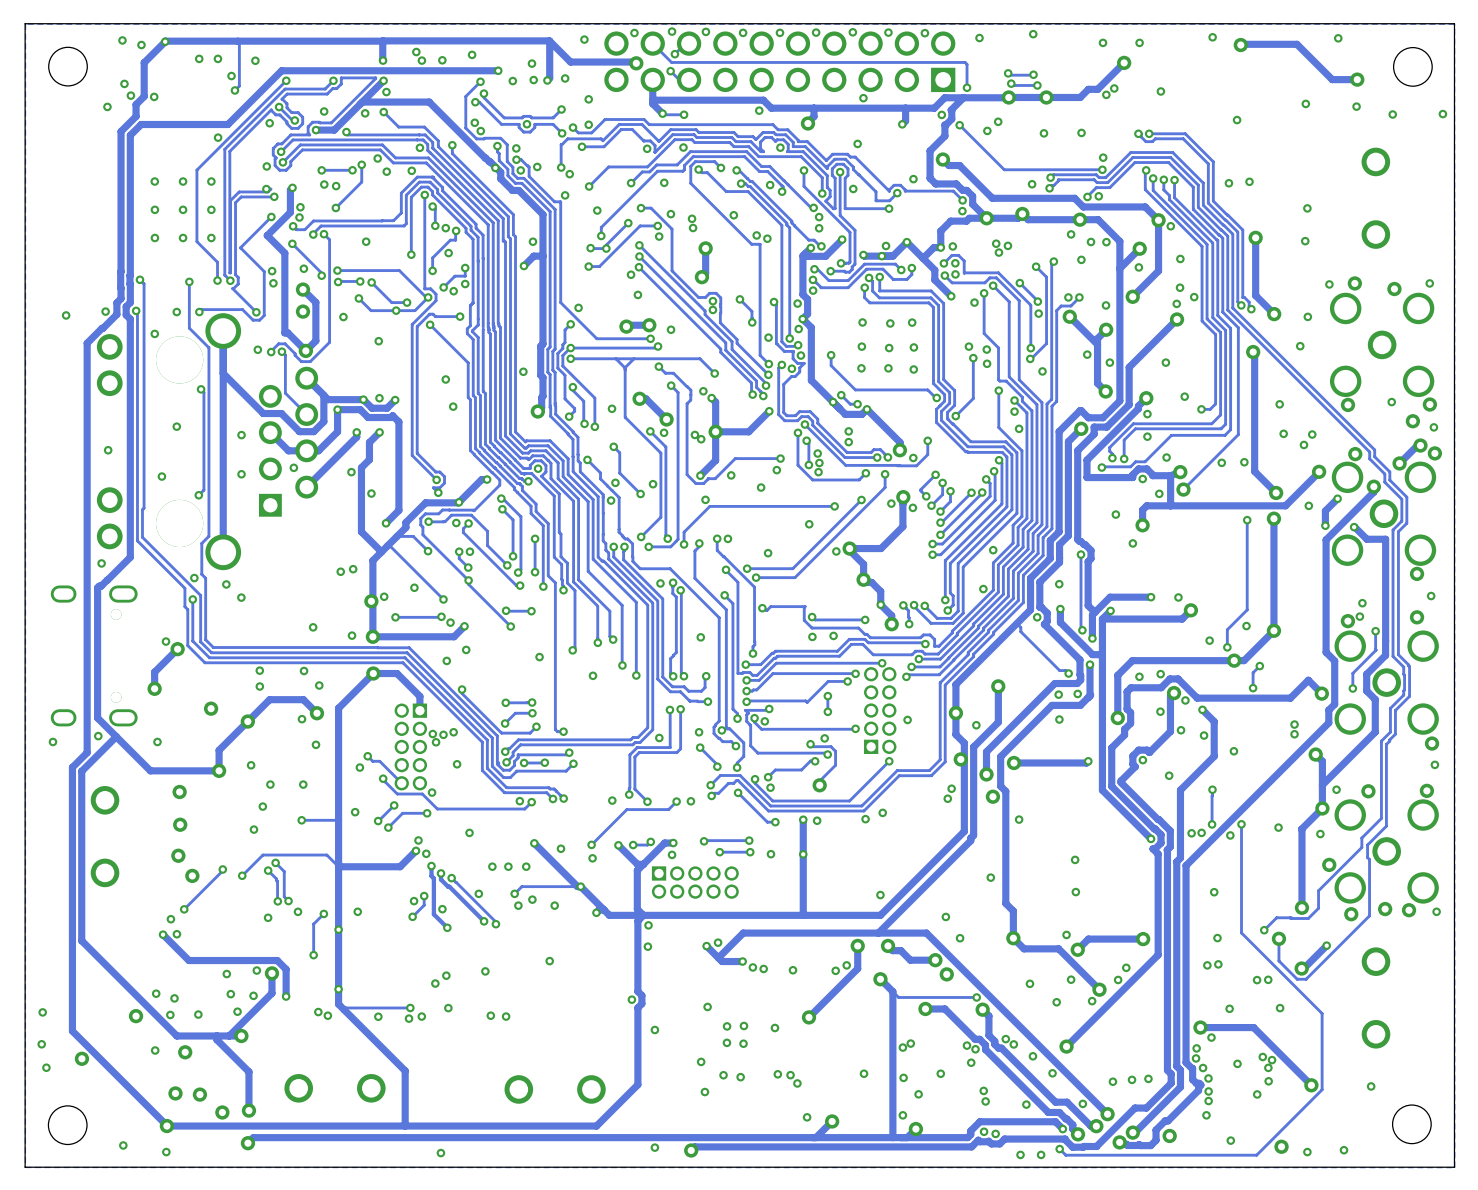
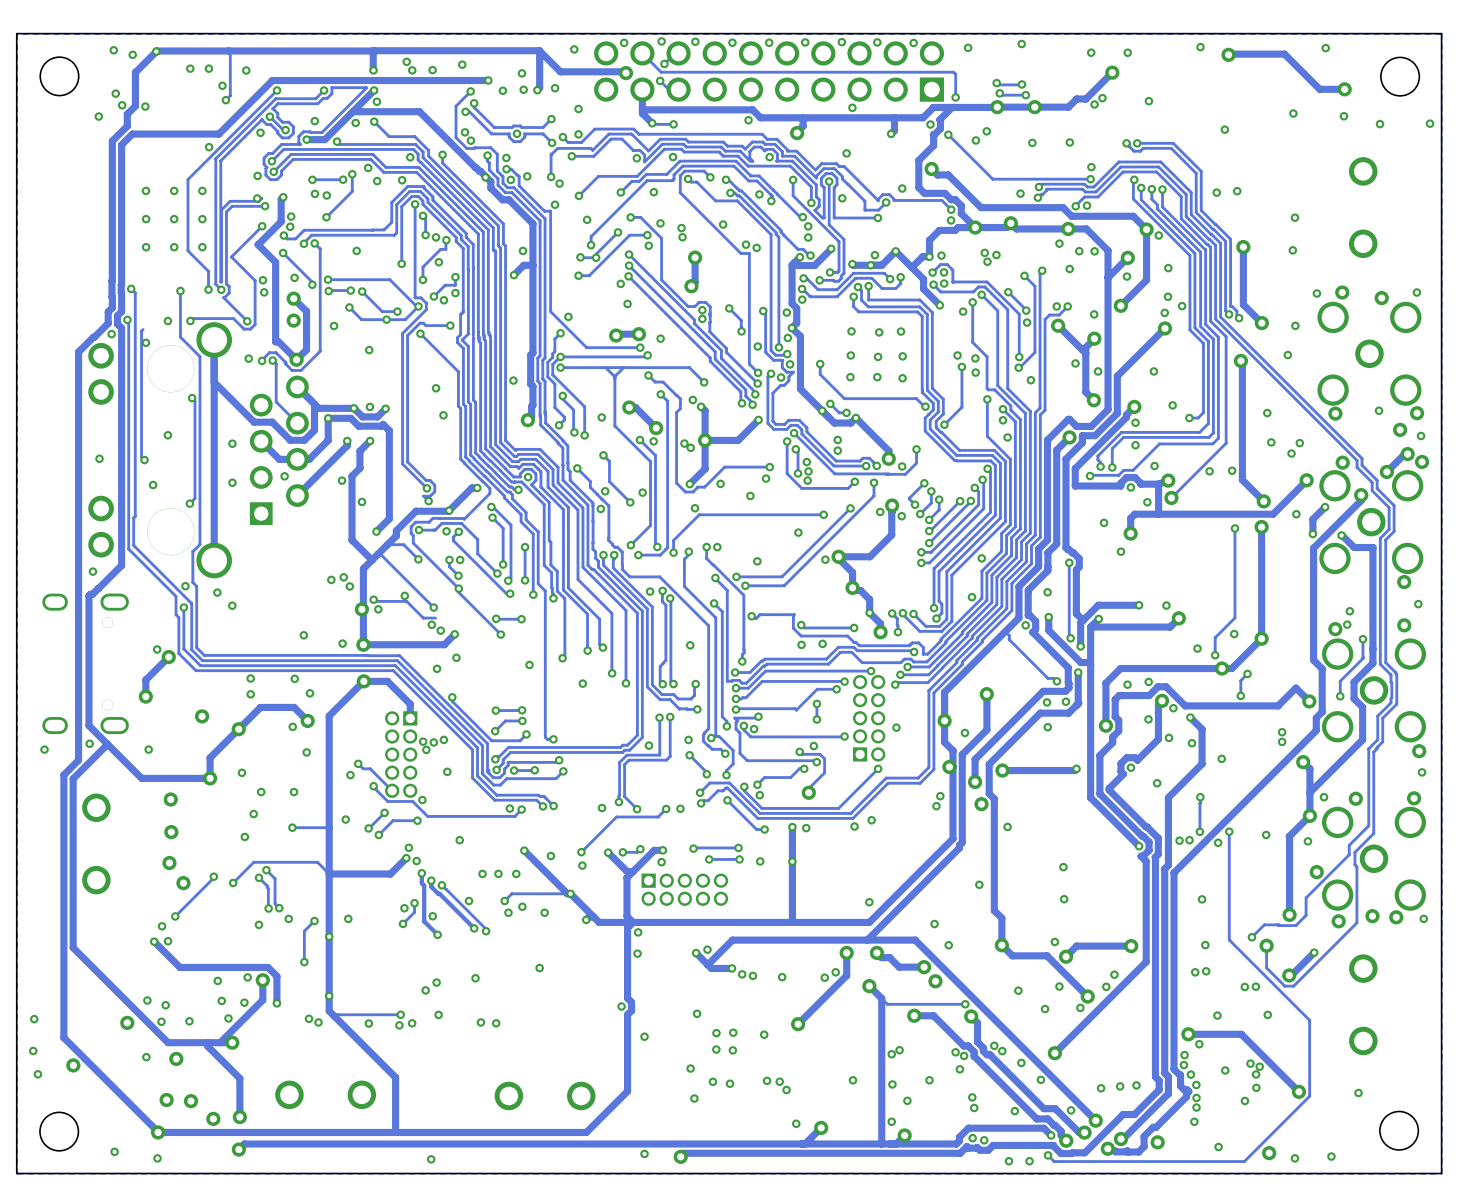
via position: (105, 311) -> (111, 334)
via: (66, 315) -> none
track: none -> (143, 329) (141, 331) (141, 457) (144, 460)
via: none -> (144, 460)
via: none -> (349, 586)
track: none -> (373, 599) (375, 601) (406, 601) (423, 618) (435, 618)
via: none -> (373, 599)
via: (384, 596) -> none
via: none -> (378, 609)
track: (441, 616) (395, 617) -> none
via: (395, 617) -> none

